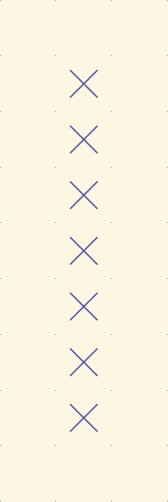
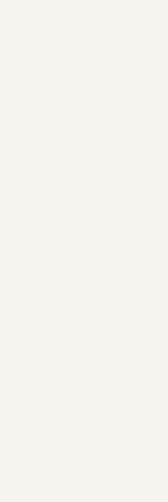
no-connect mark: (83, 83) -> none
no-connect mark: (83, 139) -> none
no-connect mark: (83, 195) -> none
no-connect mark: (83, 250) -> none
no-connect mark: (83, 306) -> none
no-connect mark: (83, 362) -> none
no-connect mark: (83, 417) -> none

